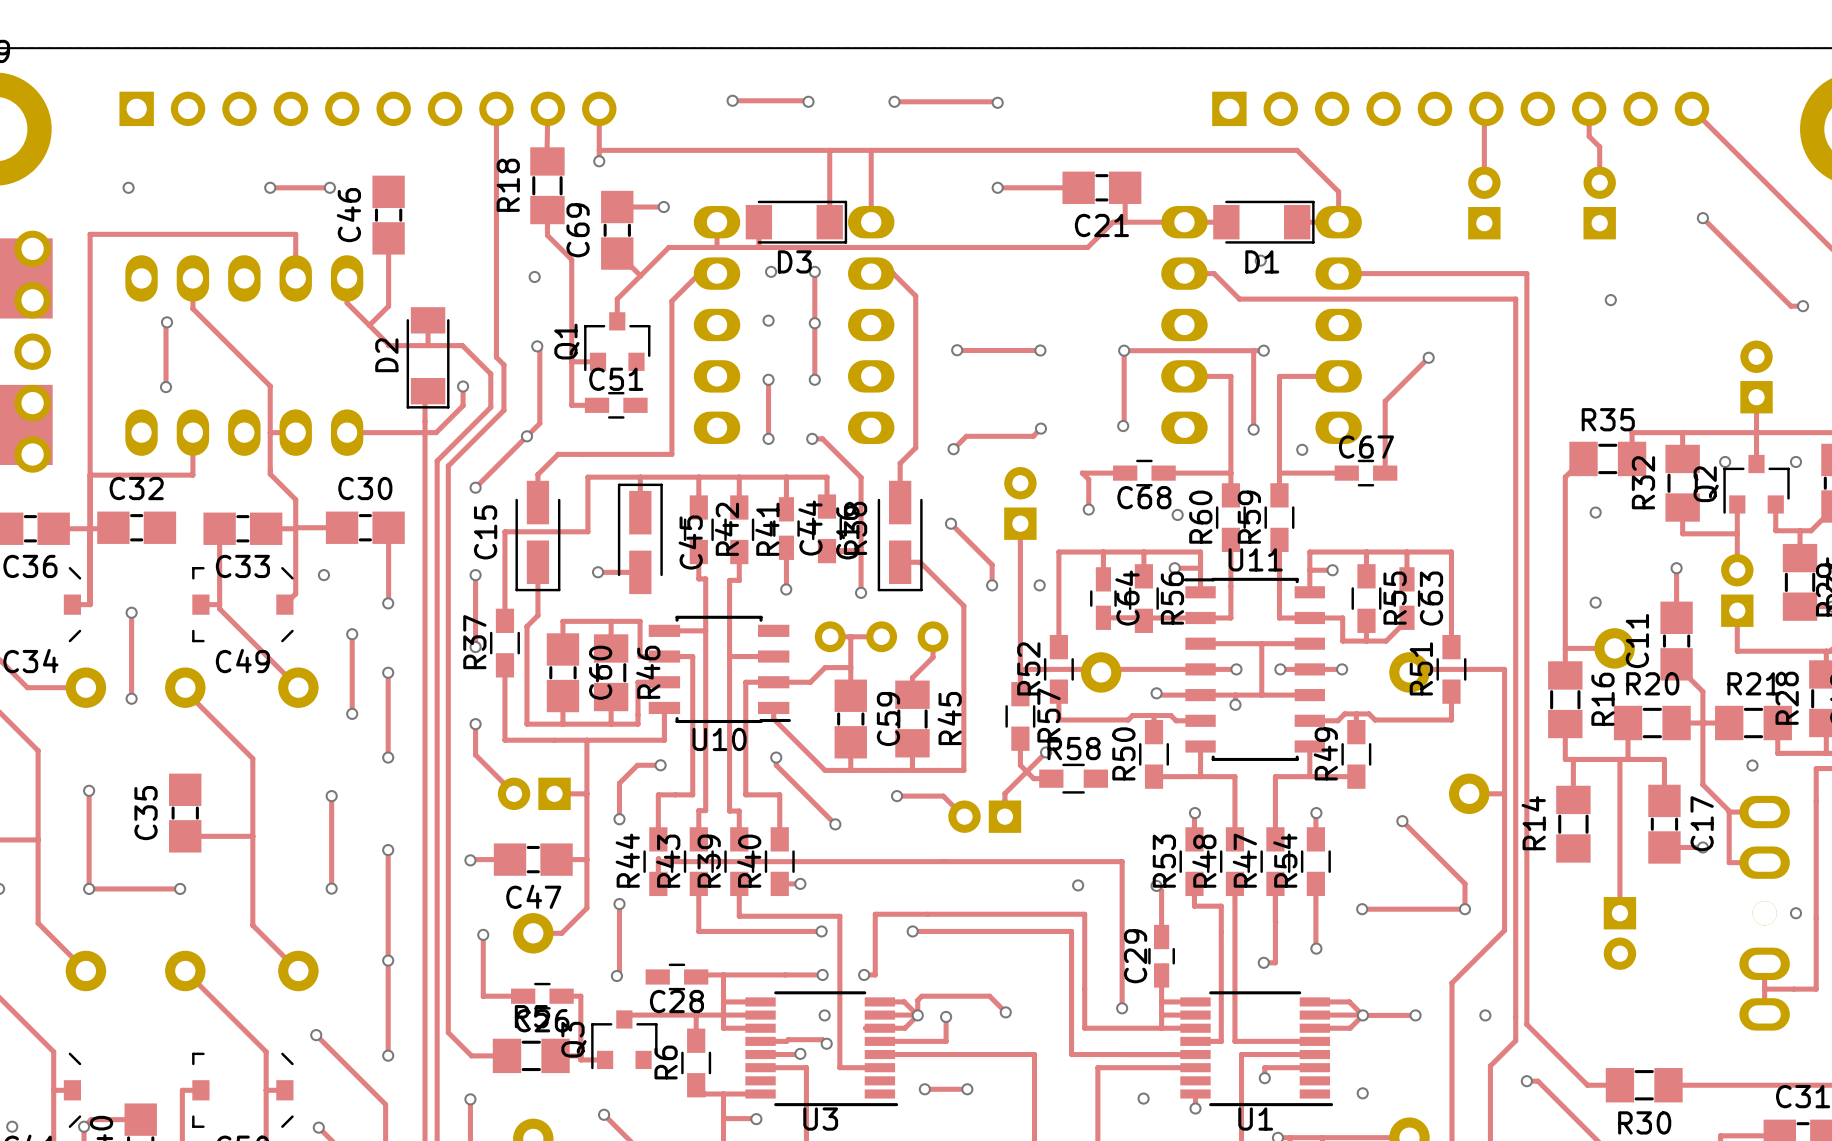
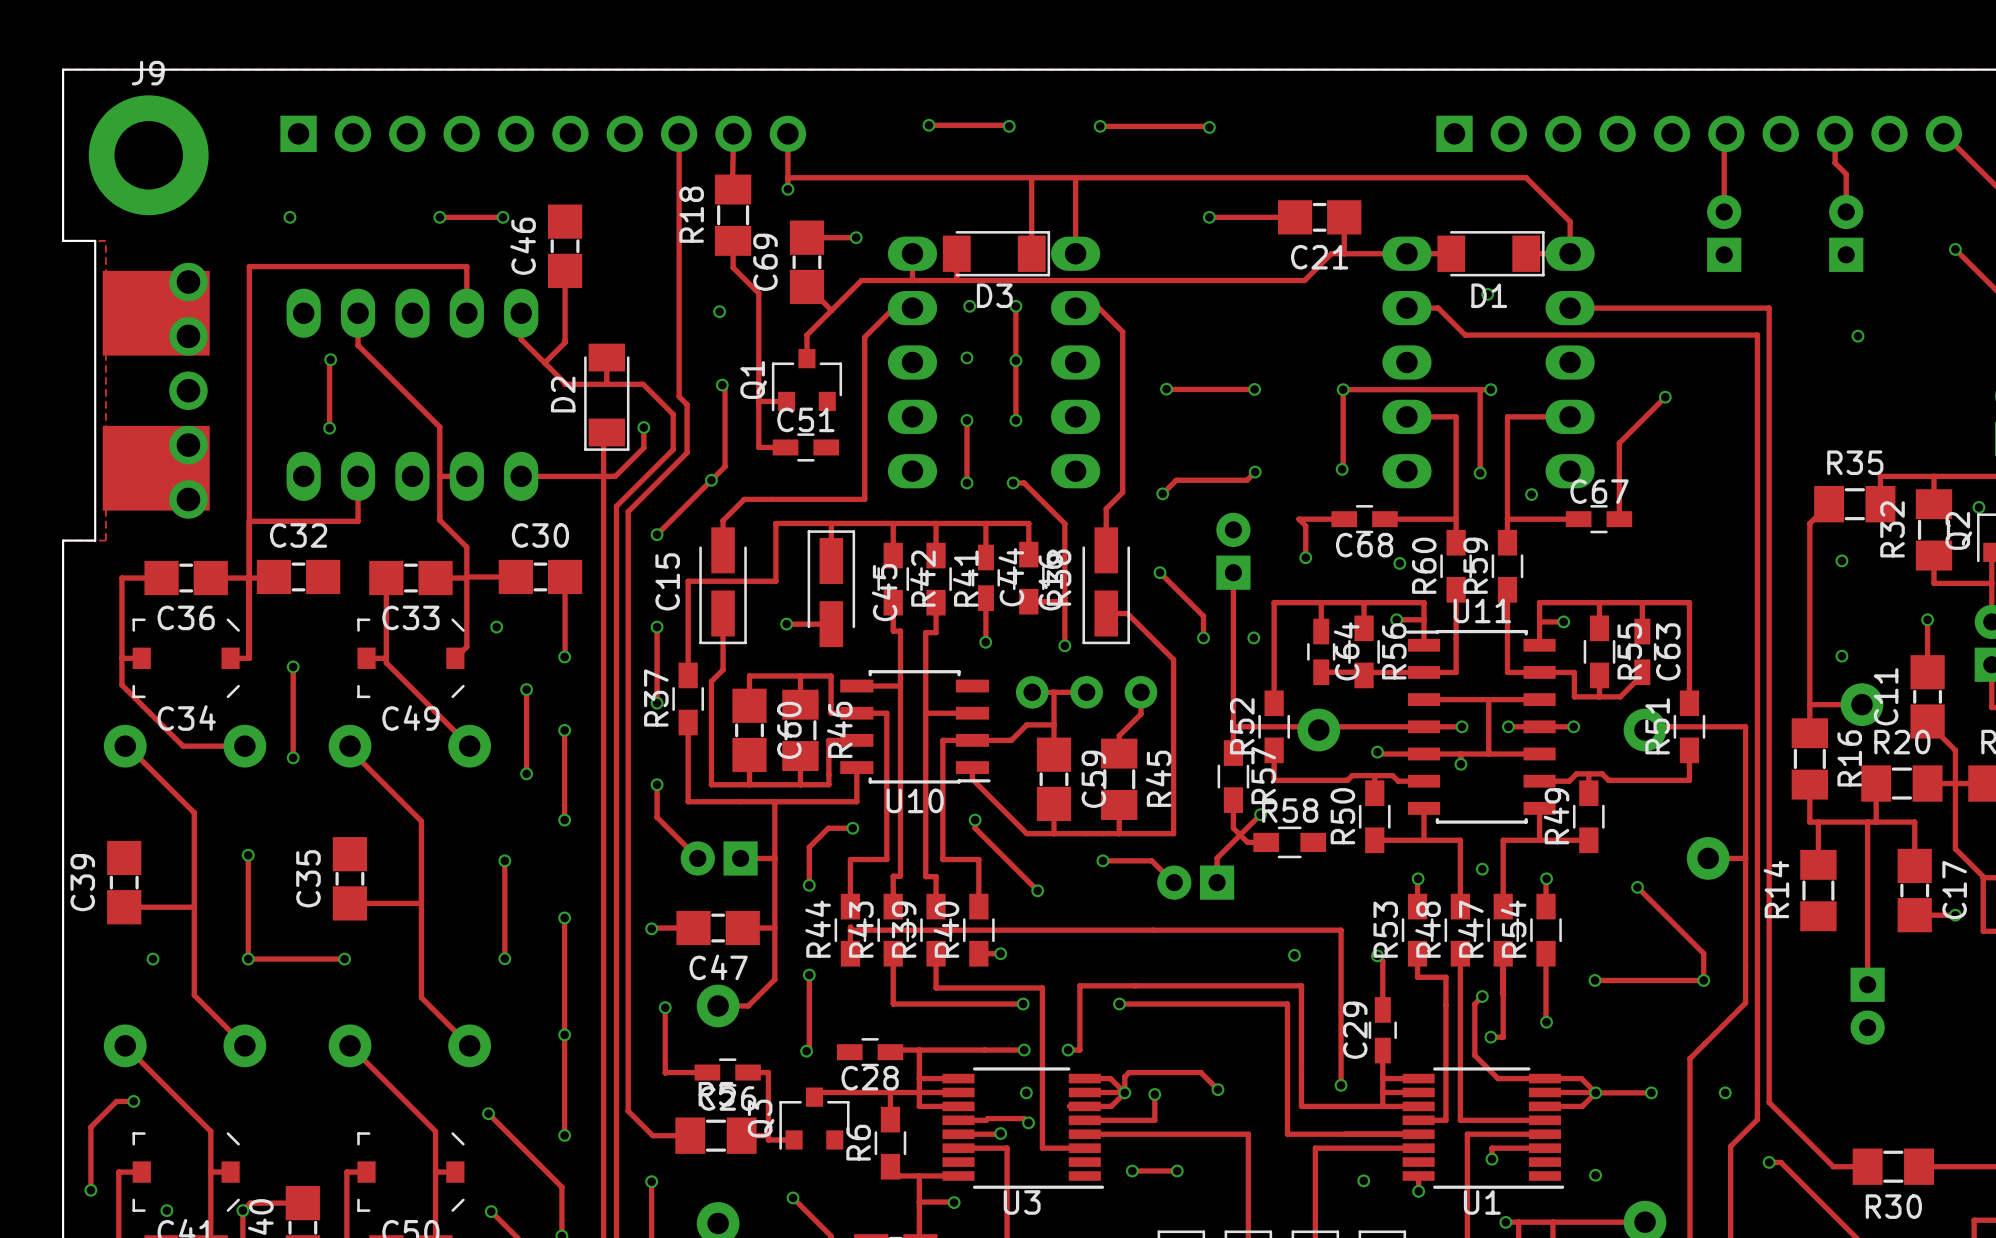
via: none -> (1482, 869)
track: none -> (1482, 996) (1474, 1004) (1474, 1055) (1498, 1078) (1544, 1078)
via: none -> (1482, 996)

